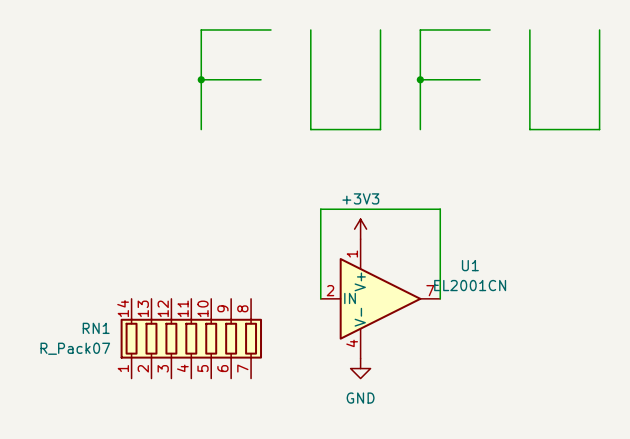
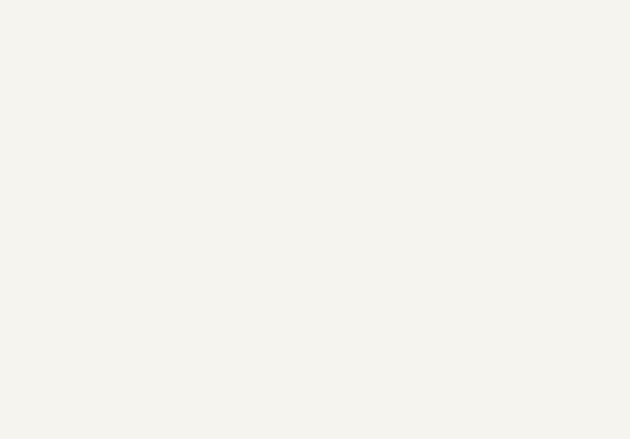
wire: (270, 29) (201, 29) (201, 129) -> none
wire: (310, 29) (310, 129) (380, 129) (380, 29) -> none
wire: (490, 29) (420, 29) (420, 129) -> none
wire: (529, 29) (529, 129) (599, 129) (599, 29) -> none
wire: (201, 79) (261, 79) -> none
junction: (201, 79) -> none
wire: (420, 79) (480, 79) -> none
junction: (420, 79) -> none
power symbol: +3V3 (360, 229) -> none
wire: (320, 298) (320, 209) (440, 209) (440, 298) -> none
U1: EL2001CN (380, 298) -> none
RN1: R_Pack07 (191, 338) -> none
power symbol: GND (360, 368) -> none

